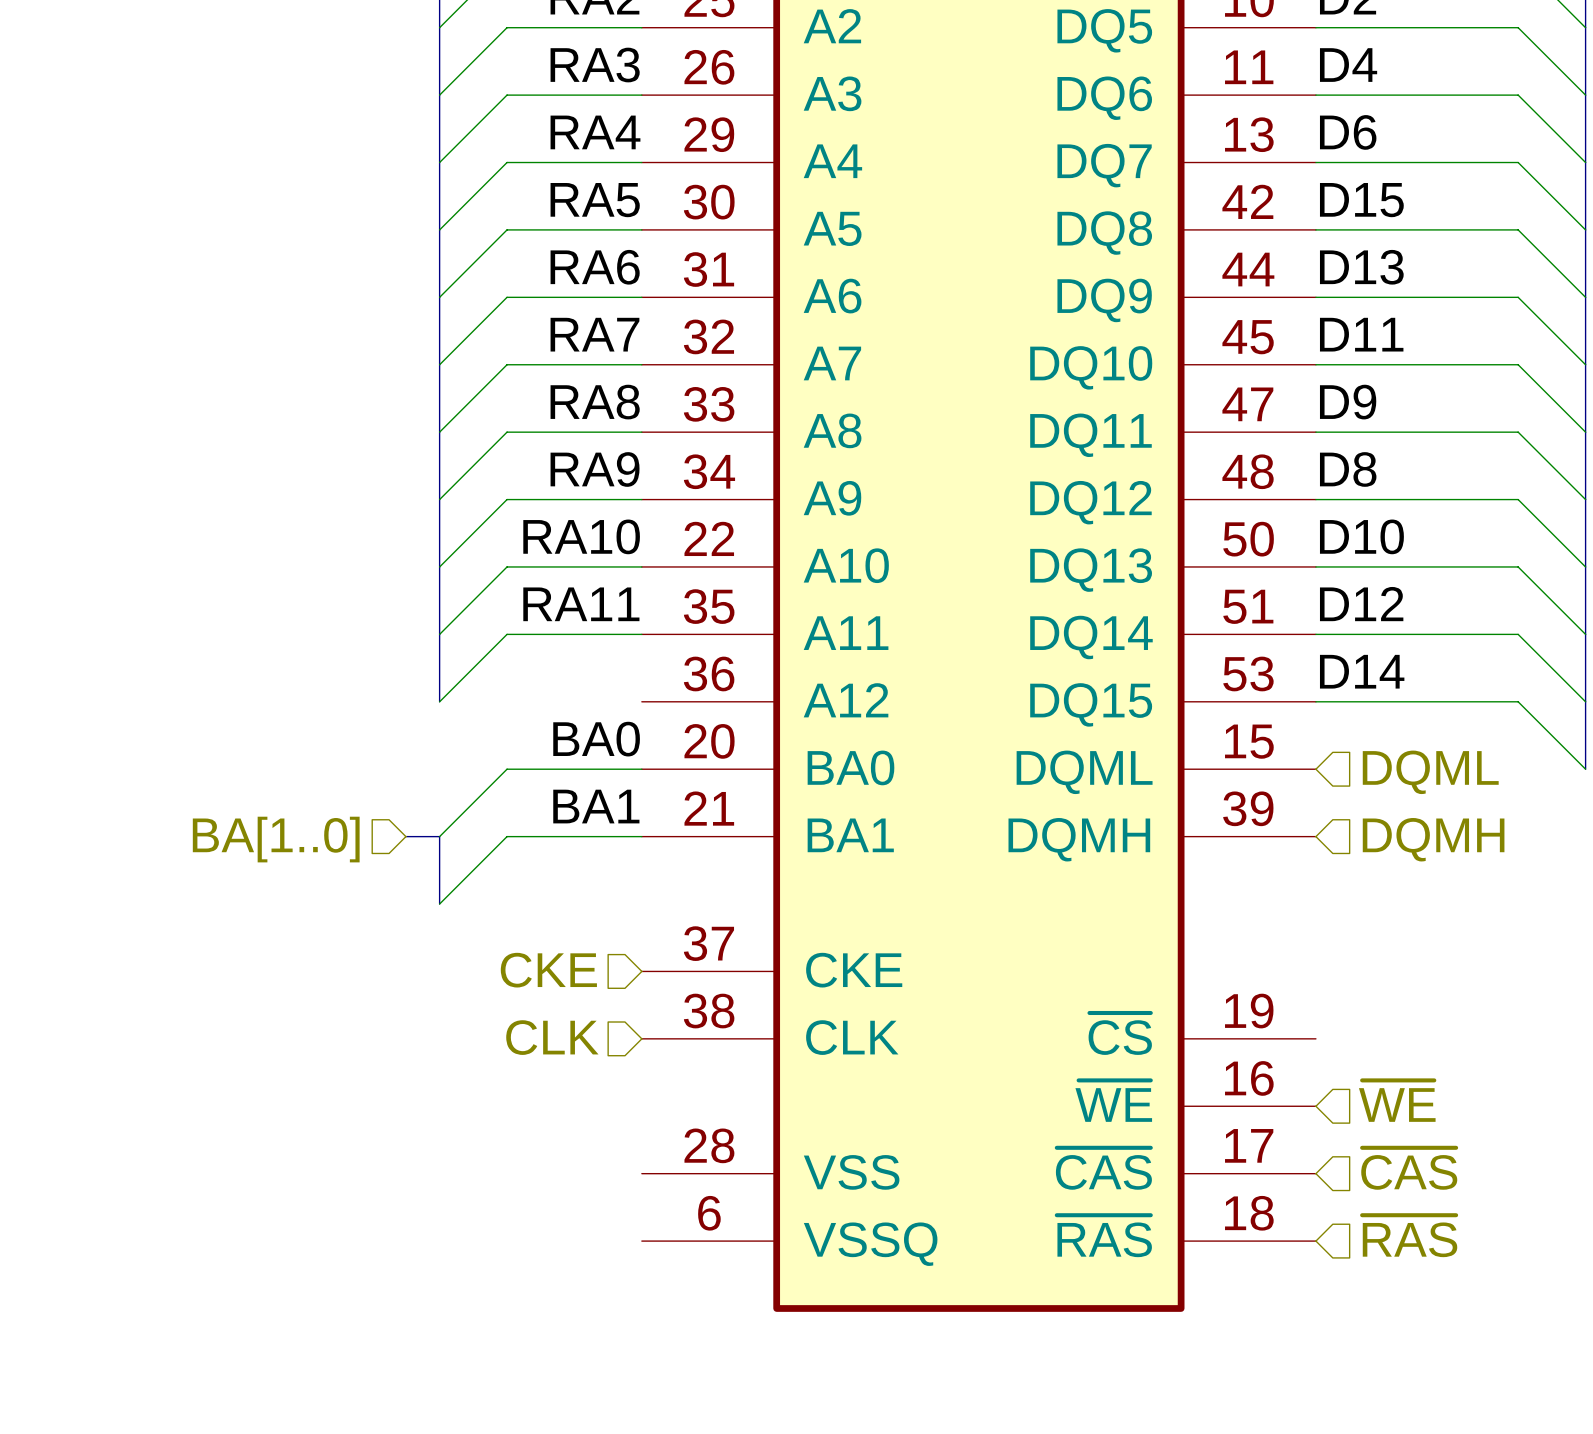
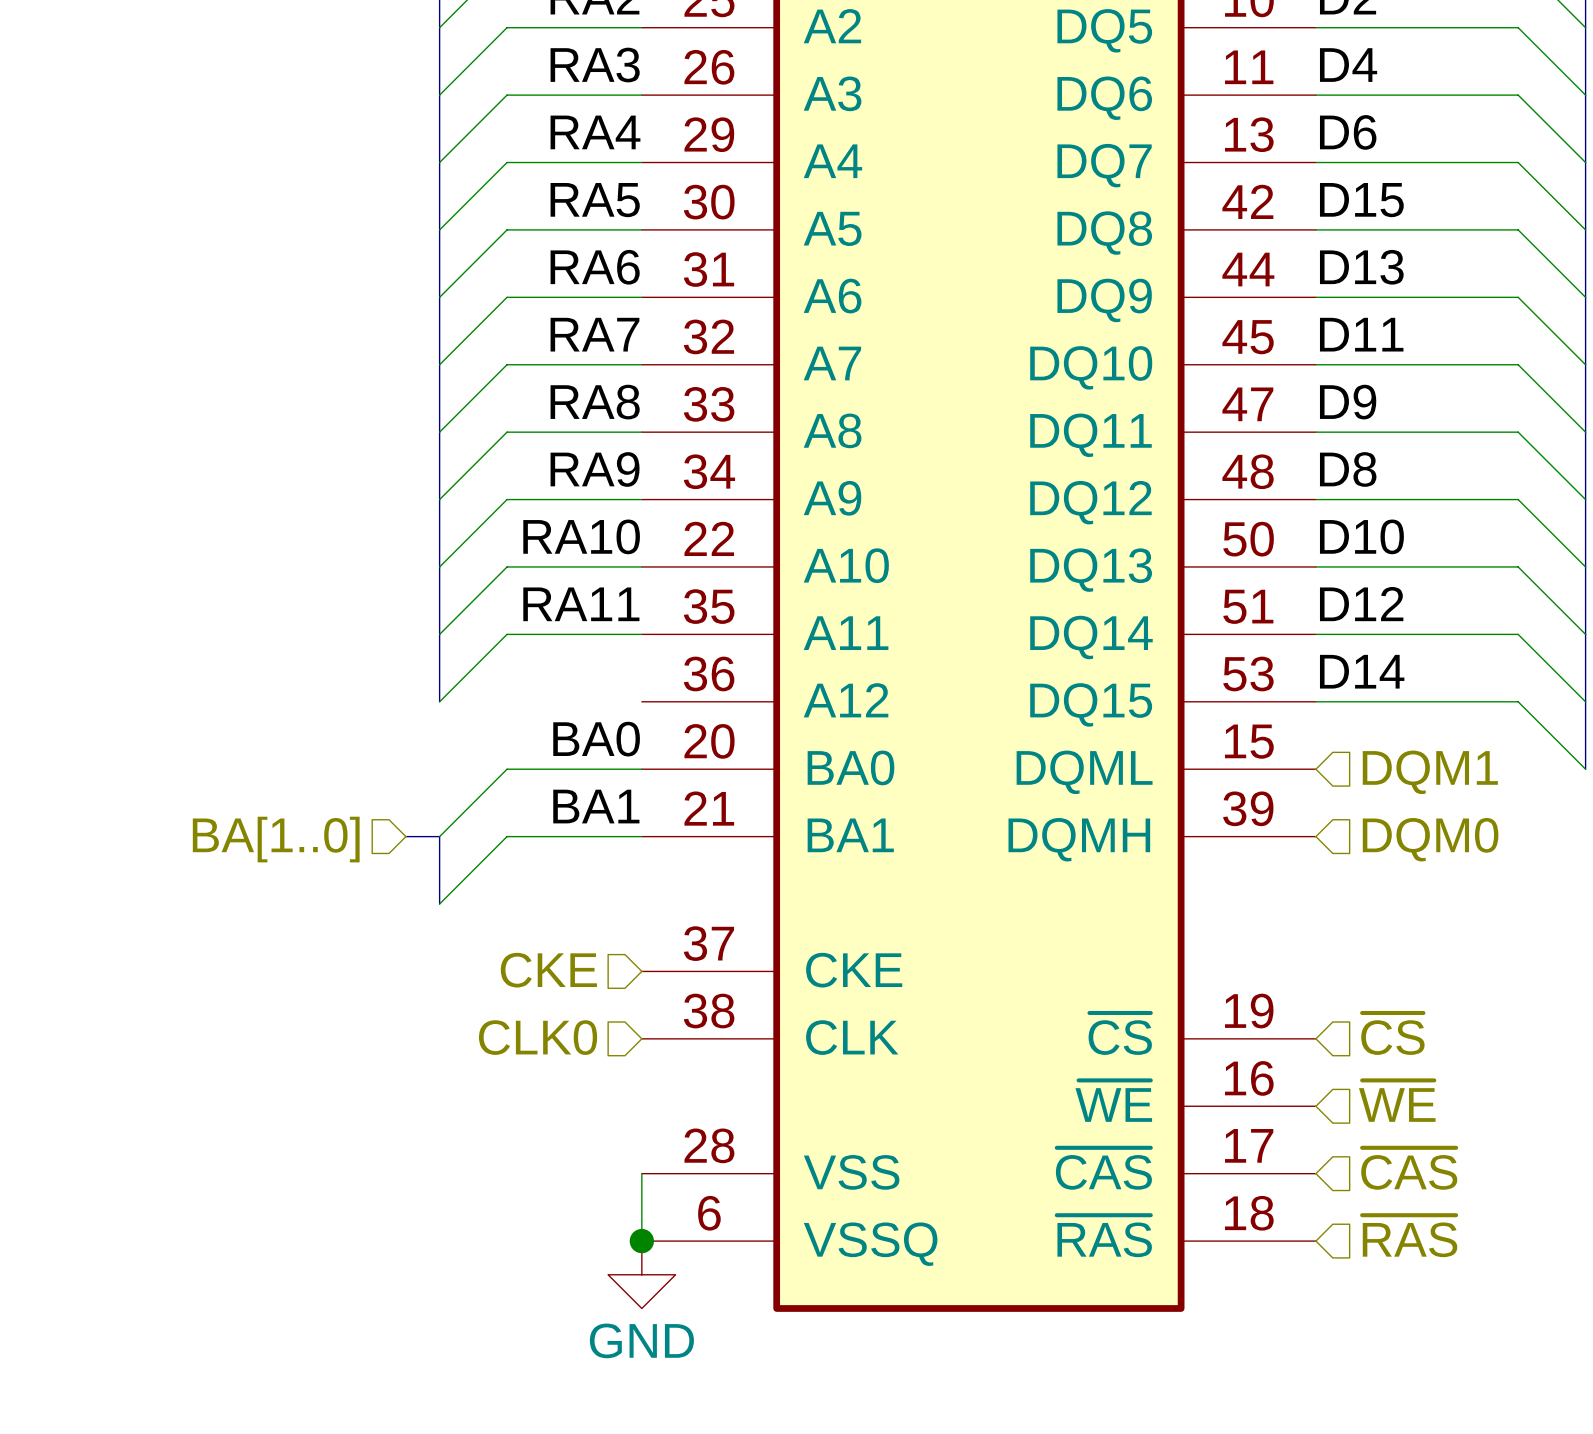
hierarchical label: DQML (1430, 772) -> DQM1 (1430, 772)
hierarchical label: DQMH (1433, 839) -> DQM0 (1430, 839)
hierarchical label: none -> ~{CS} (1392, 1033)
hierarchical label: CLK (552, 1037) -> CLK0 (538, 1037)
wire: none -> (641, 1173) (641, 1241)
junction: none -> (641, 1241)
power symbol: none -> GND (641, 1274)

